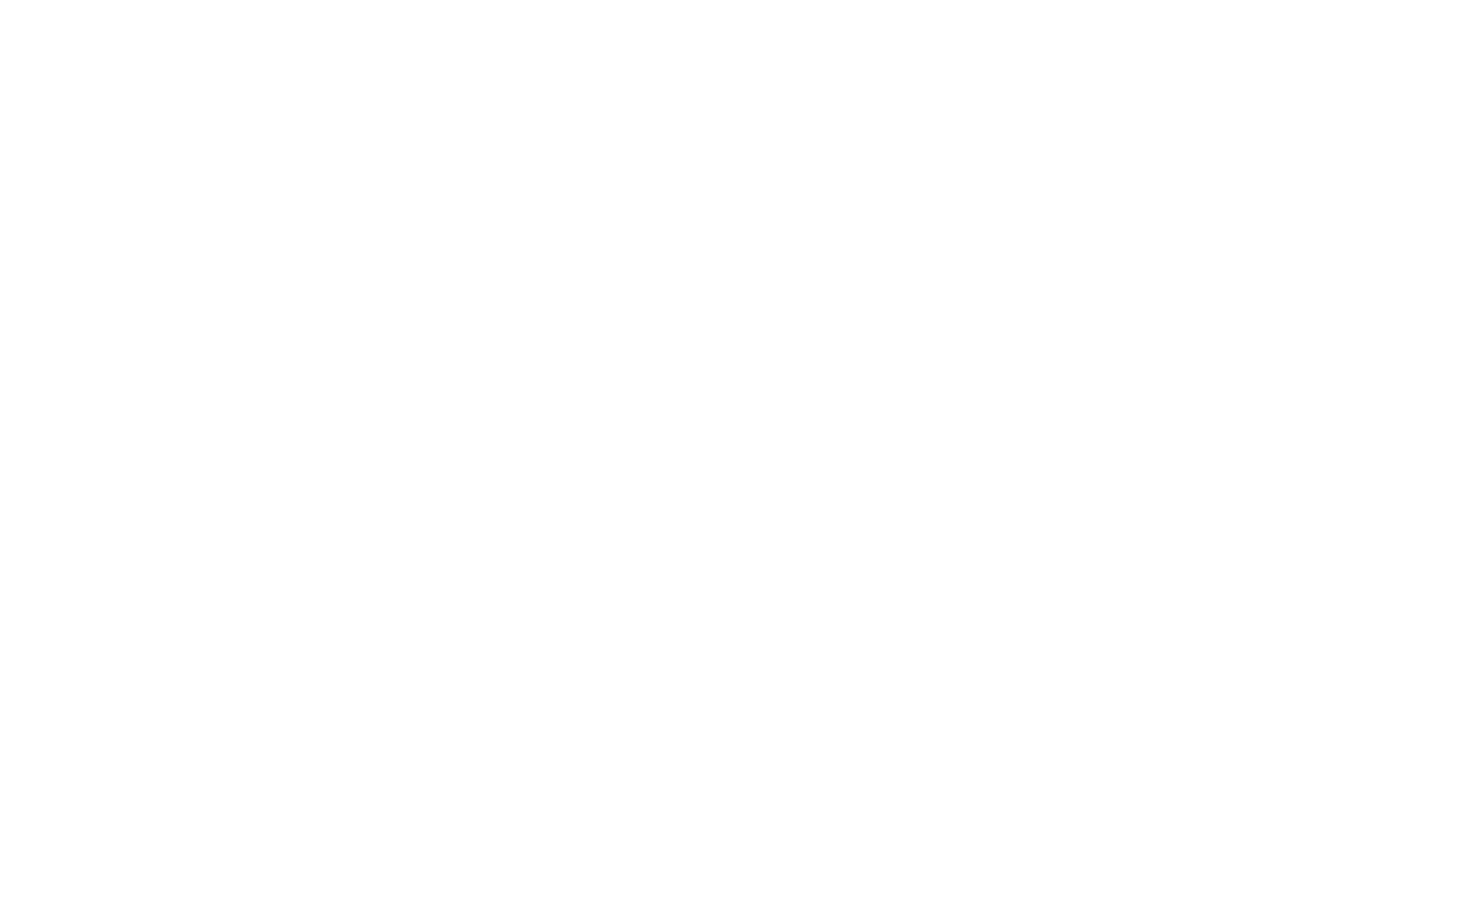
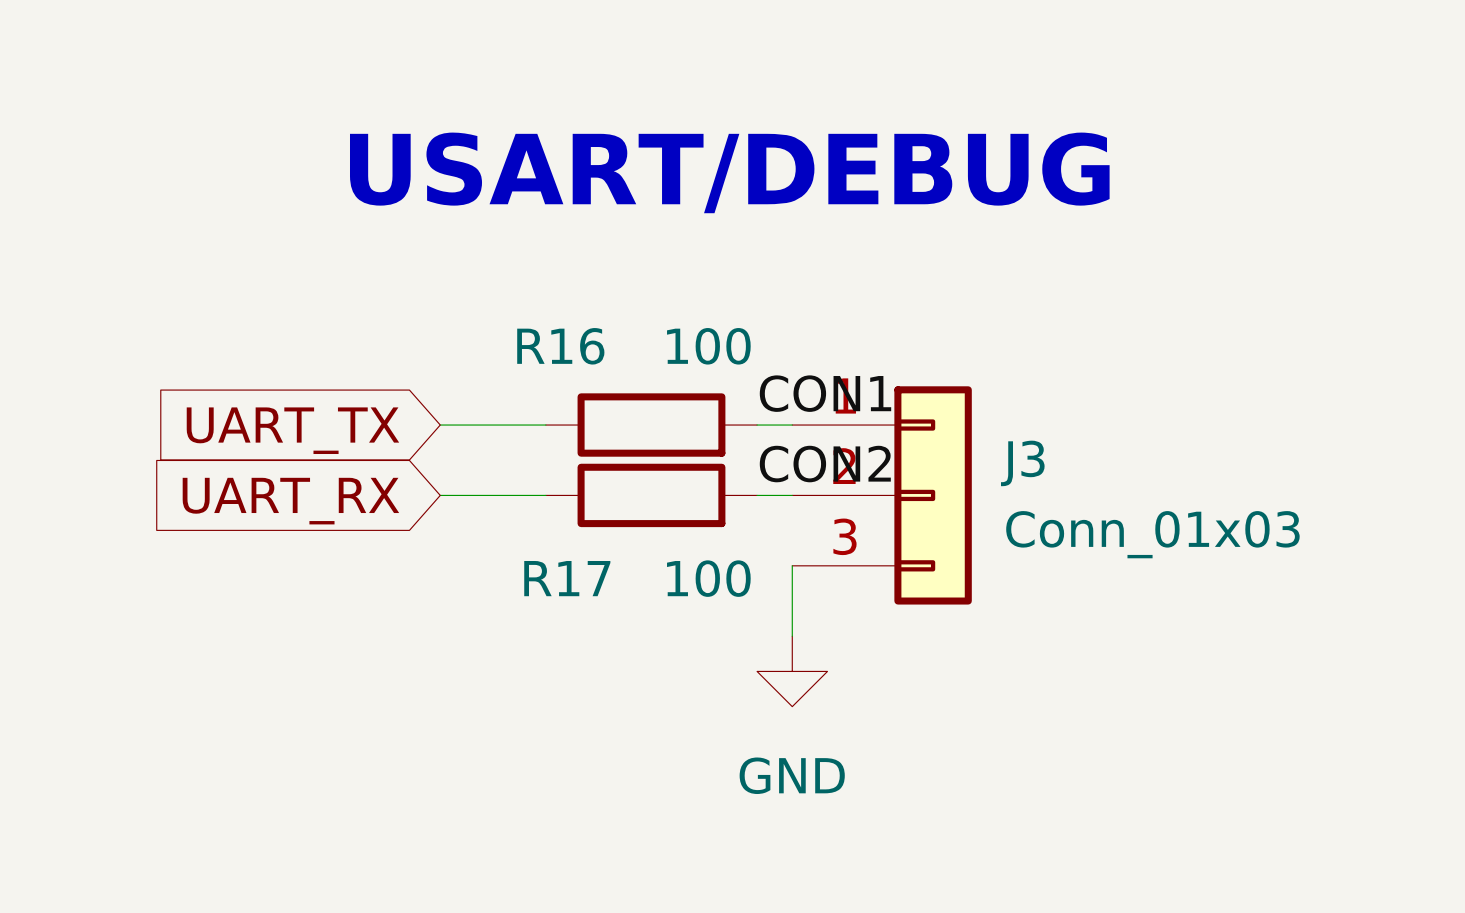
text: none -> USART/DEBUG (729, 172)
label: none -> CON1 (825, 393)
wire: none -> (440, 425) (545, 425)
R16: none -> 100 (651, 425)
wire: none -> (757, 425) (792, 425)
global label: none -> UART_TX (292, 430)
label: none -> CON2 (825, 464)
wire: none -> (440, 495) (545, 495)
R17: none -> 100 (651, 495)
wire: none -> (757, 495) (792, 495)
J3: none -> Conn_01x03 (882, 495)
global label: none -> UART_RX (290, 501)
wire: none -> (792, 565) (792, 636)
power symbol: none -> GND (792, 671)

